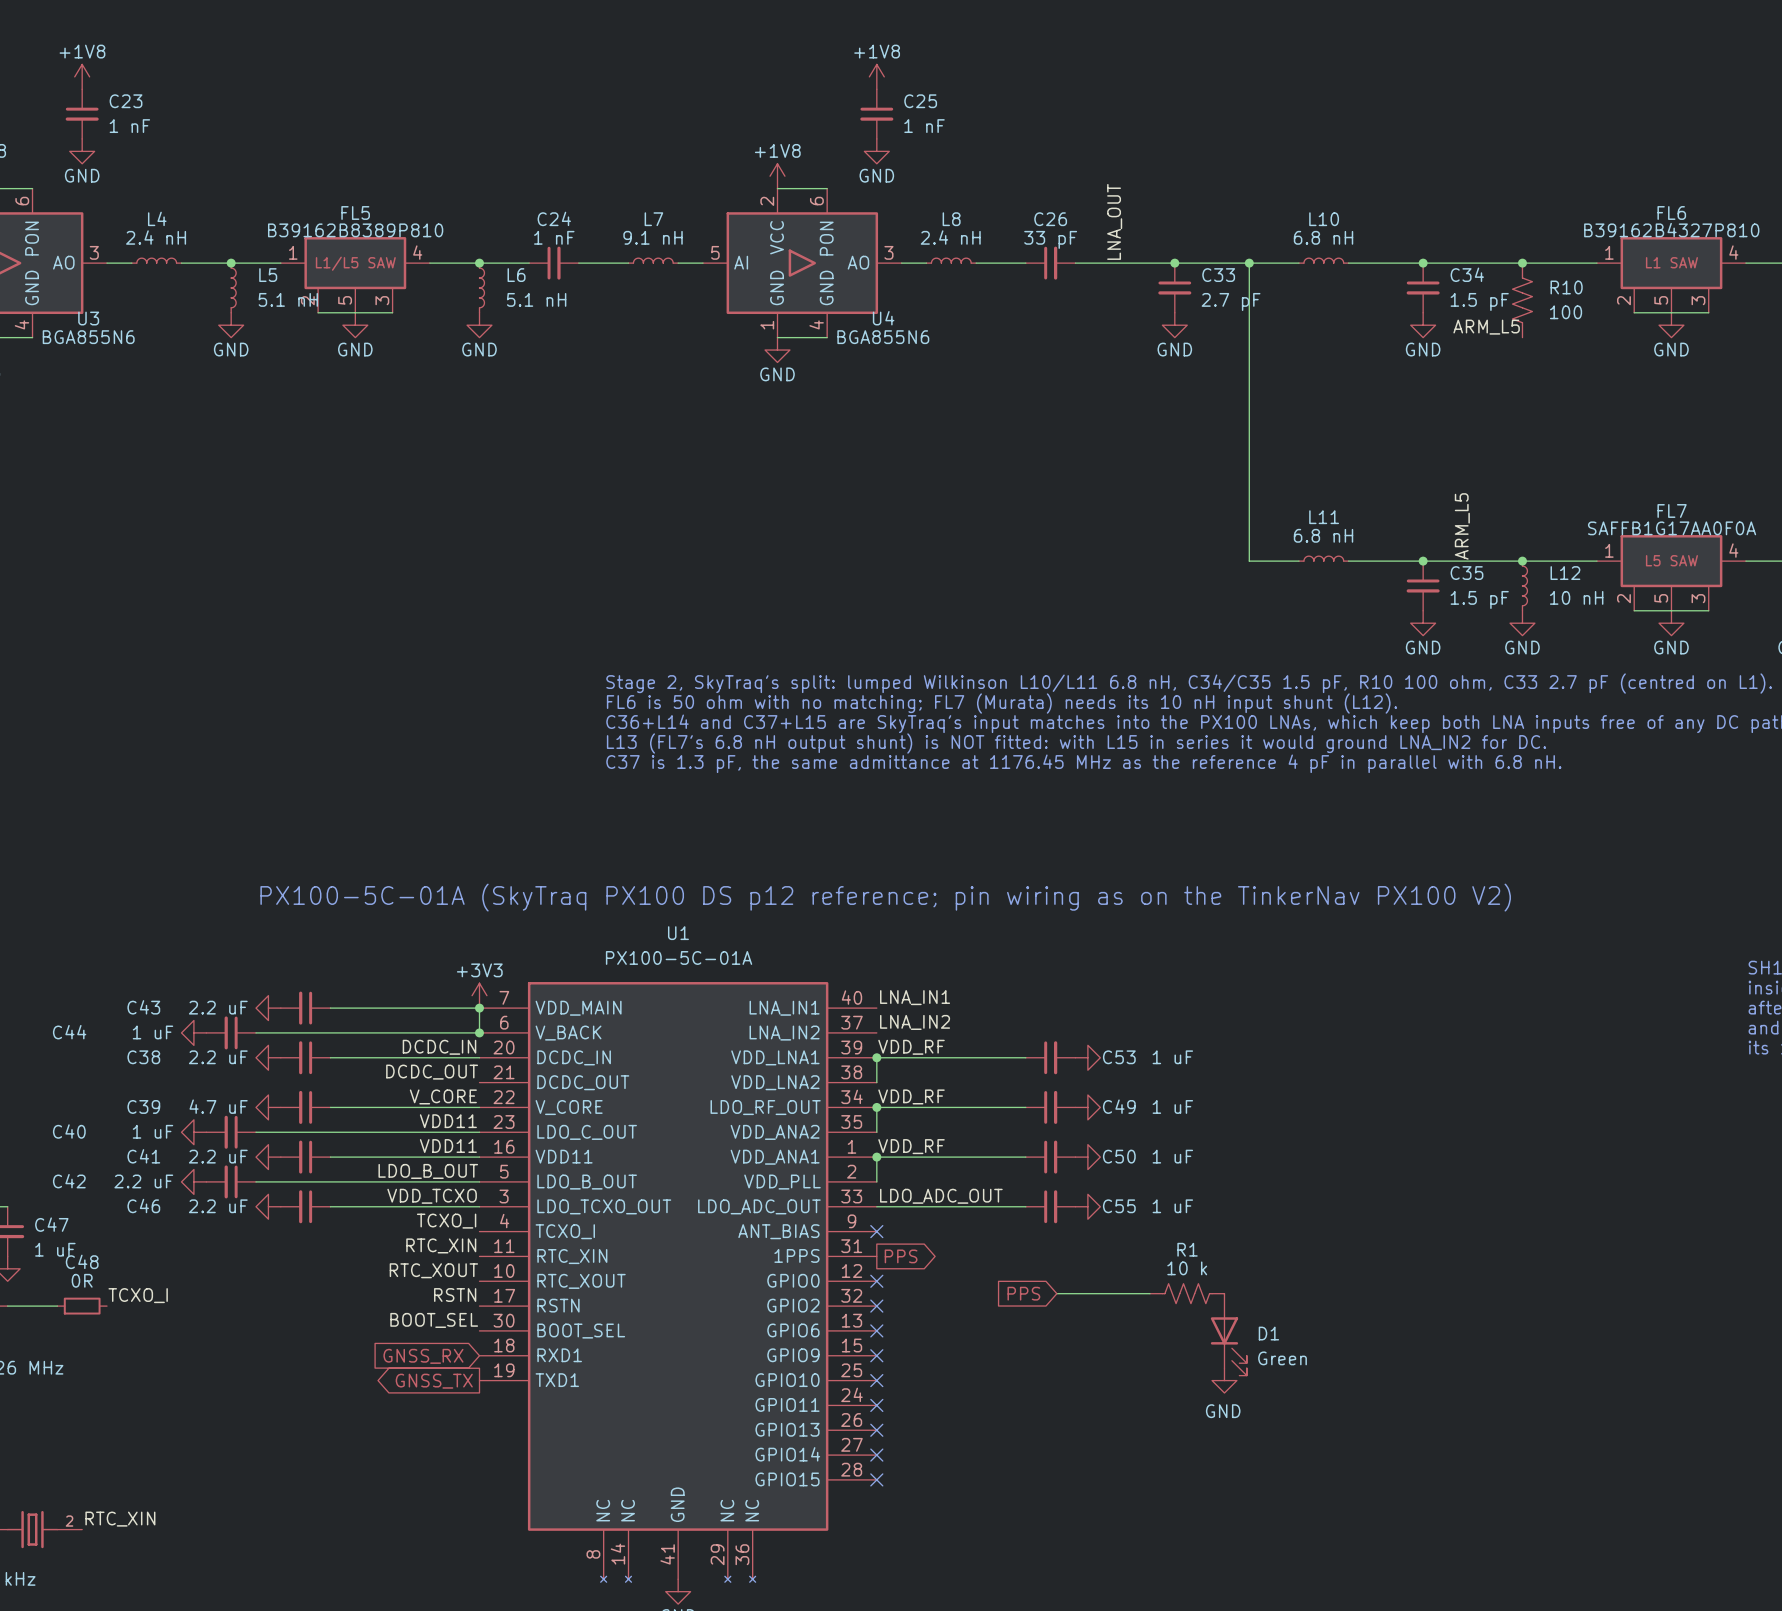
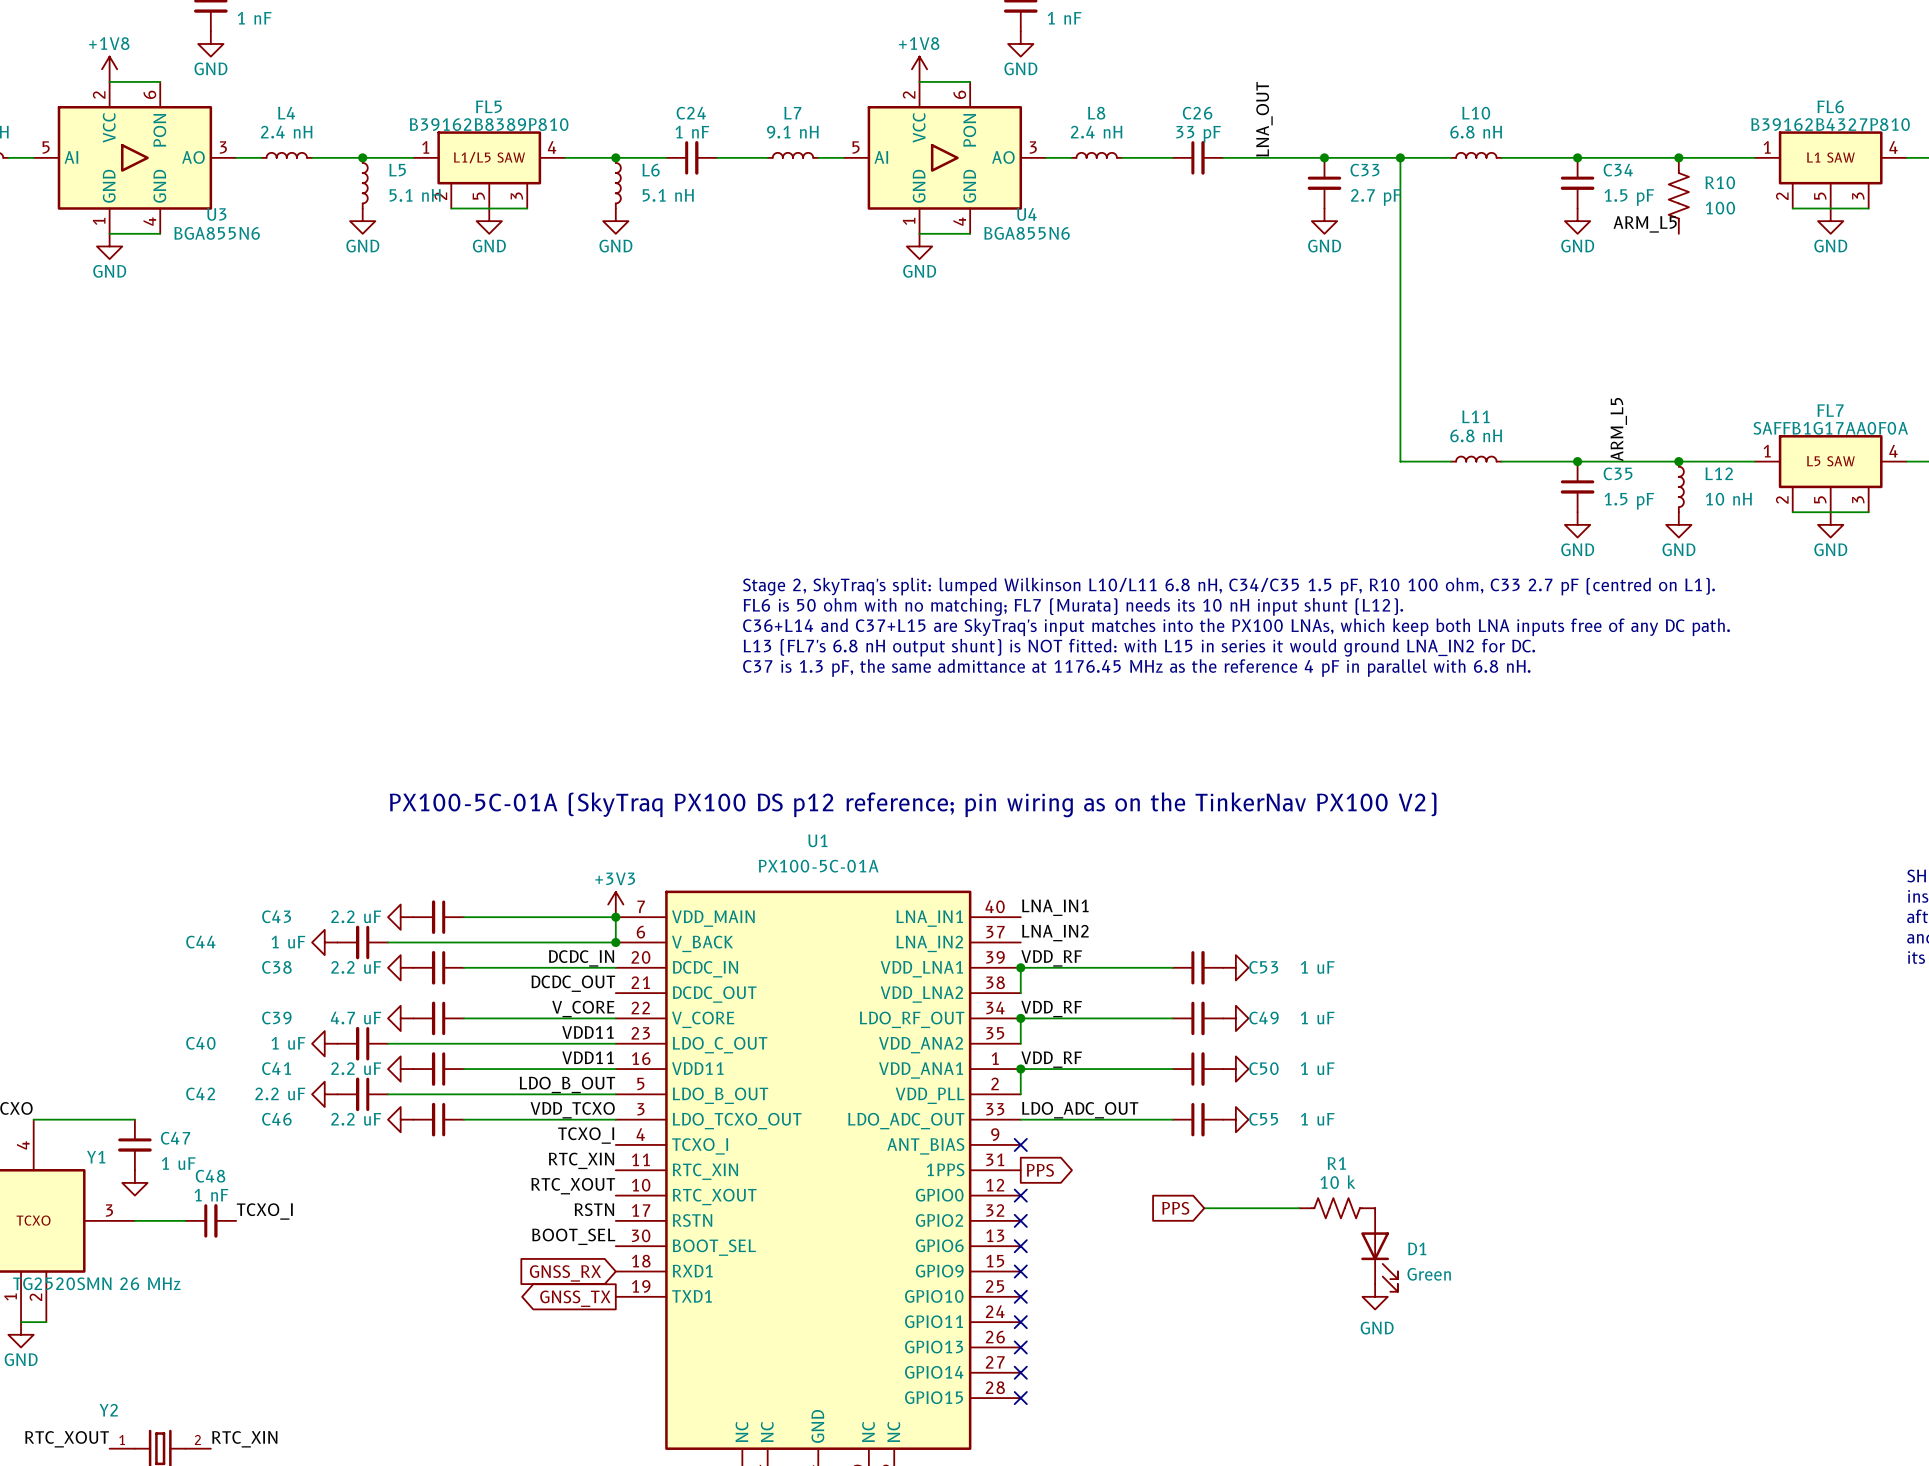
C48 value: 0R (82, 1280) -> 1 nF (211, 1195)
C48 symbol: [57, 1297, 108, 1315] -> [185, 1204, 237, 1238]

